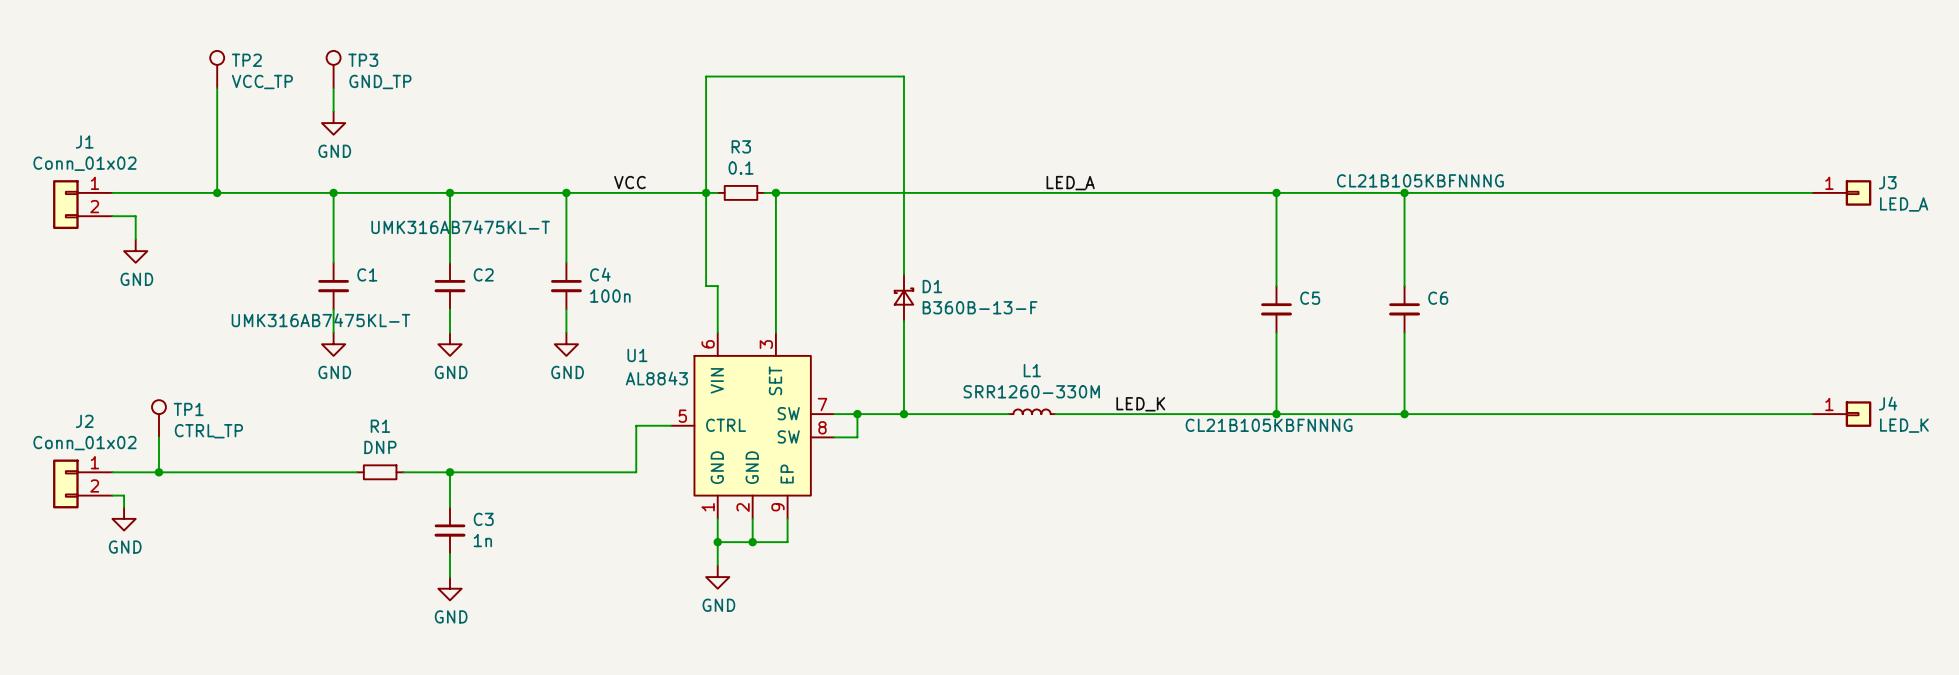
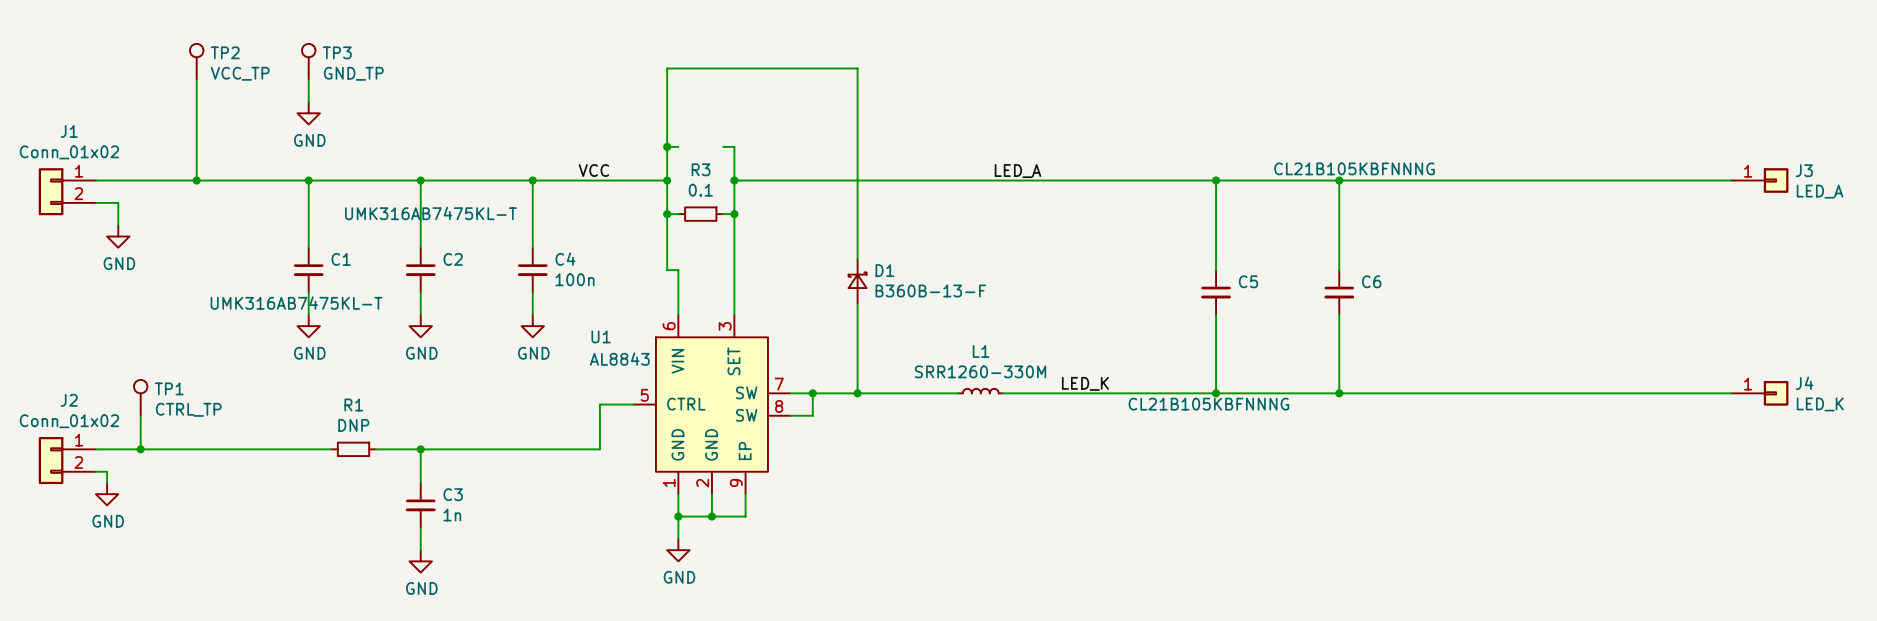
junction: none -> (667, 146)
wire: (706, 192) (717, 192) -> (667, 146) (678, 146)
R3 position: (741, 192) -> (700, 214)
wire: (764, 192) (775, 192) -> (723, 146) (734, 146) (734, 180)
wire: none -> (667, 214) (678, 214)
junction: none -> (667, 214)
wire: none -> (723, 214) (734, 214)
junction: none -> (734, 214)

